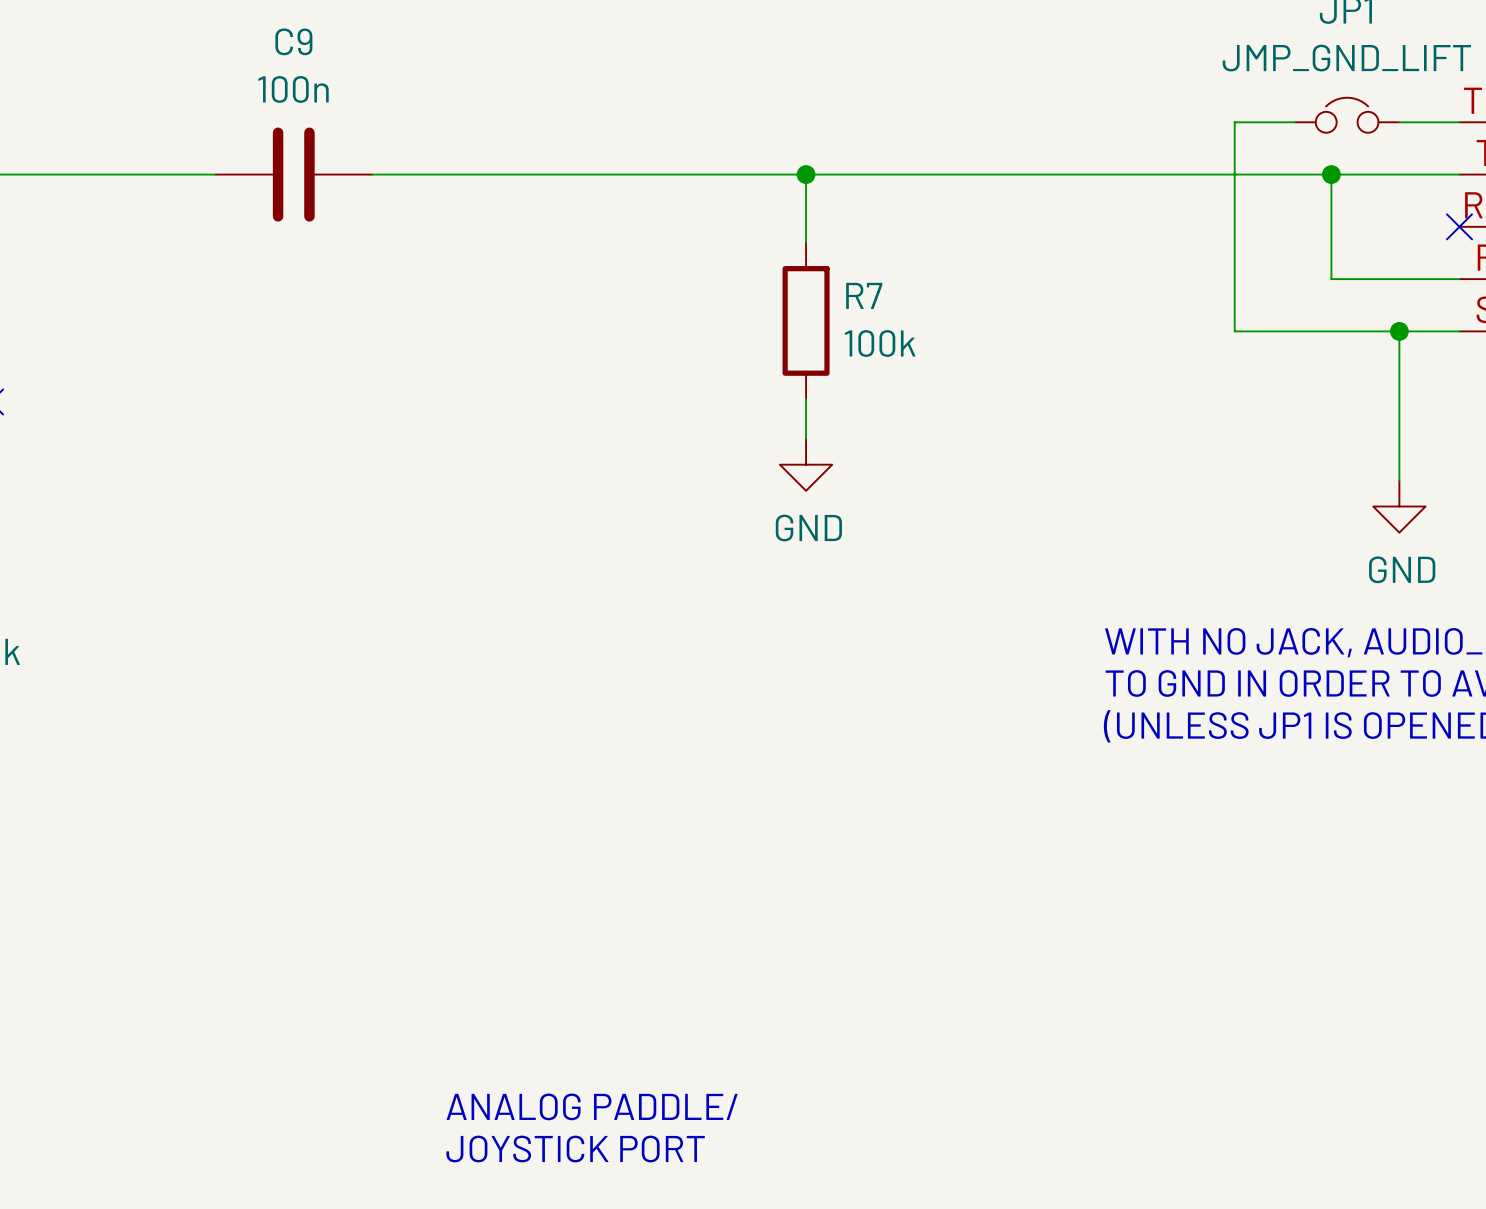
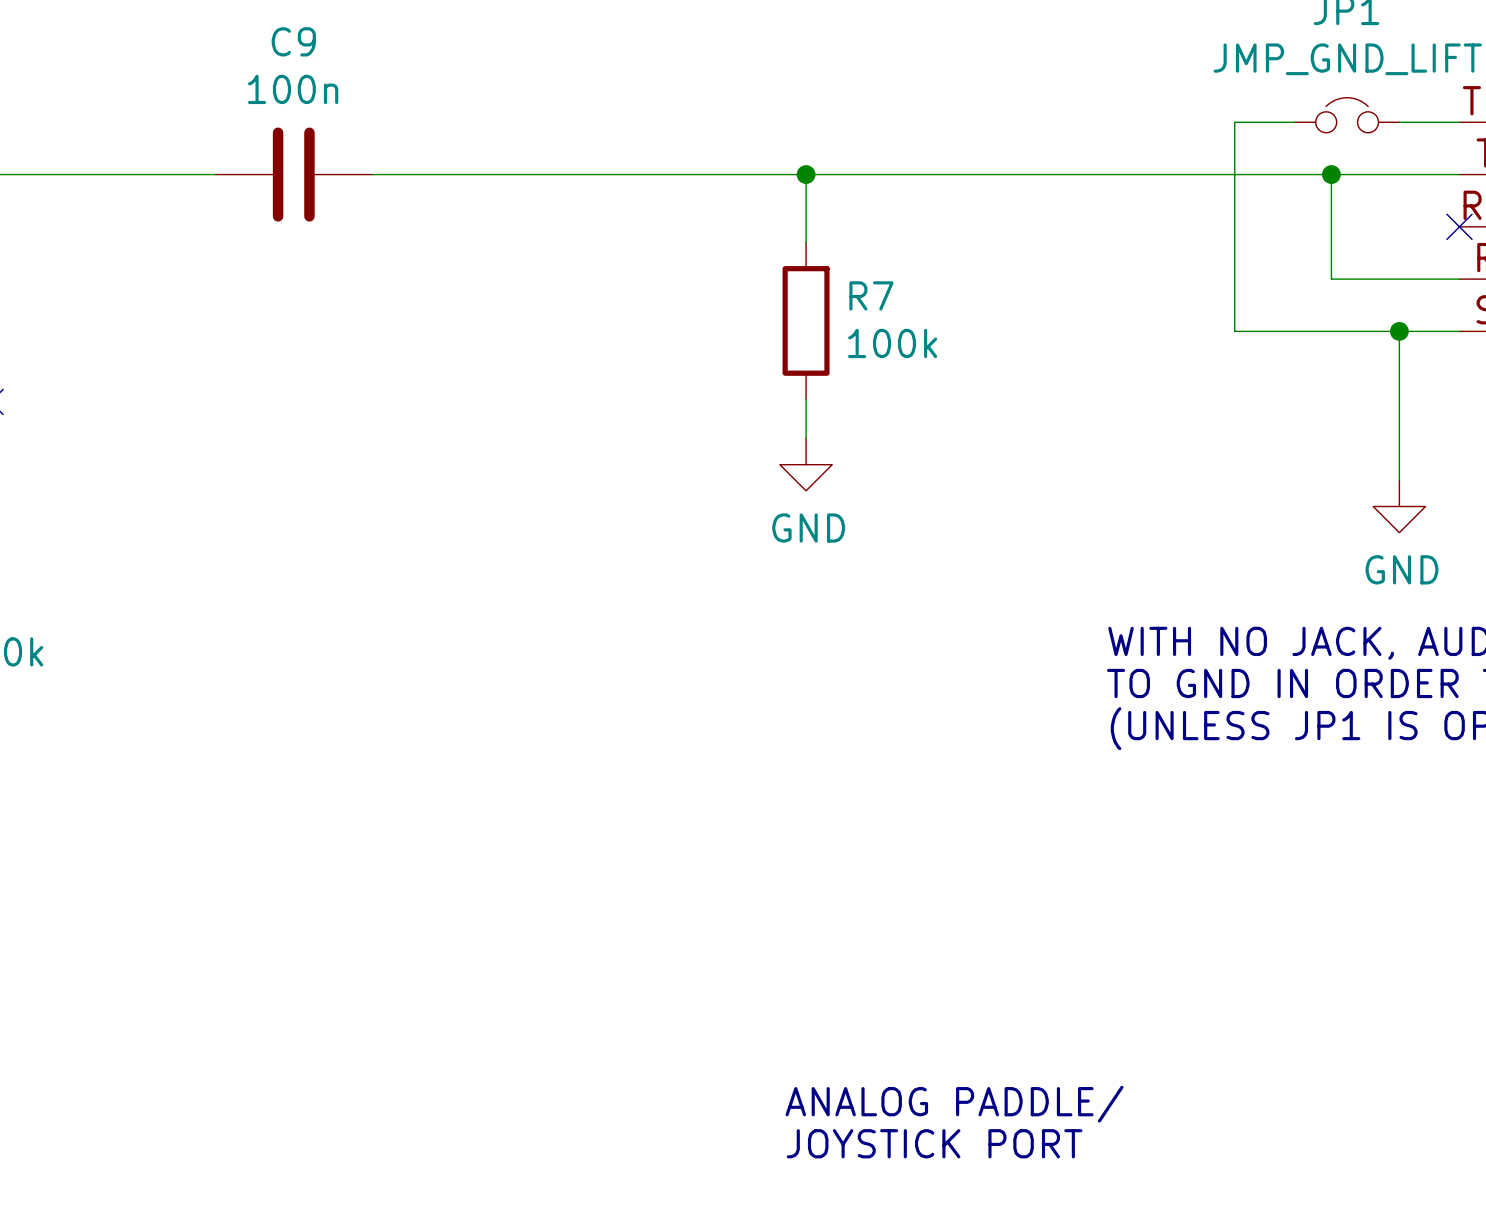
text position: ANALOG PADDLE/ (592, 1106) -> ANALOG PADDLE/ (954, 1104)
text position: JOYSTICK PORT (575, 1149) -> JOYSTICK PORT (934, 1143)

